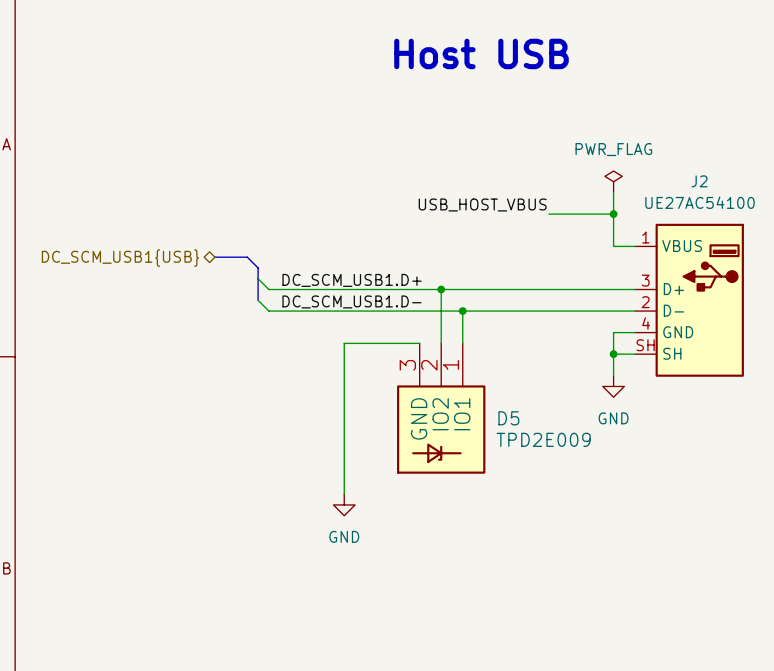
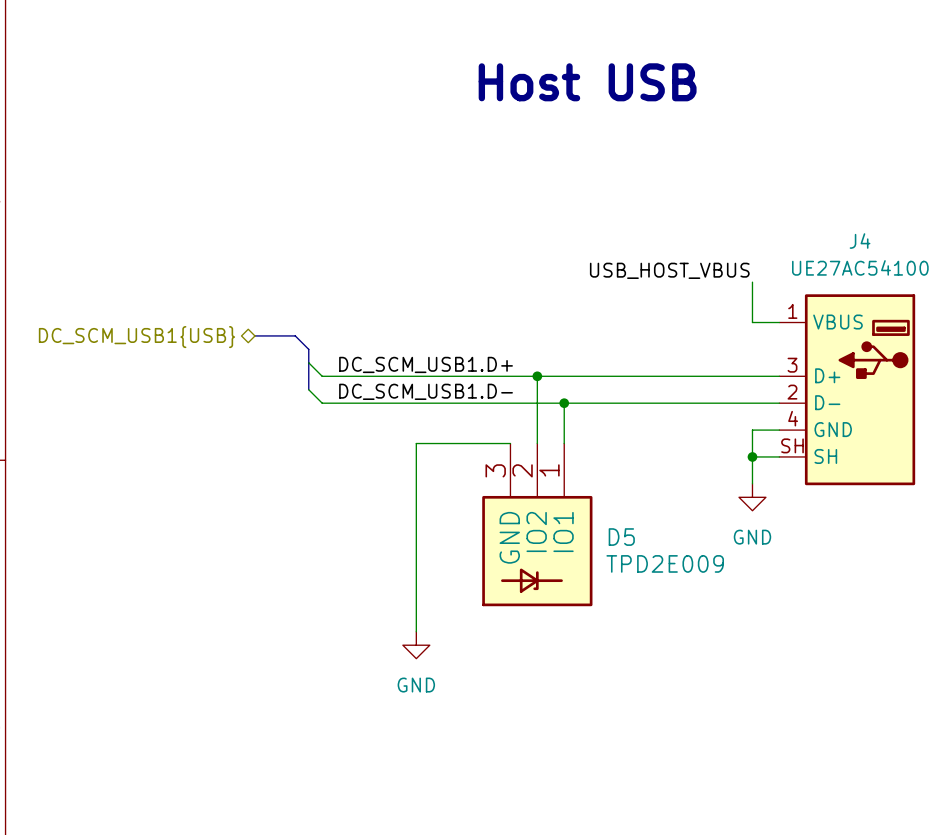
power symbol: PWR_FLAG (613, 181) -> none
J2 name: J2 (699, 181) -> J4 (860, 241)
wire: (613, 192) (613, 214) (548, 214) -> none
label position: USB_HOST_VBUS (482, 204) -> USB_HOST_VBUS (669, 270)
junction: (613, 214) -> none

